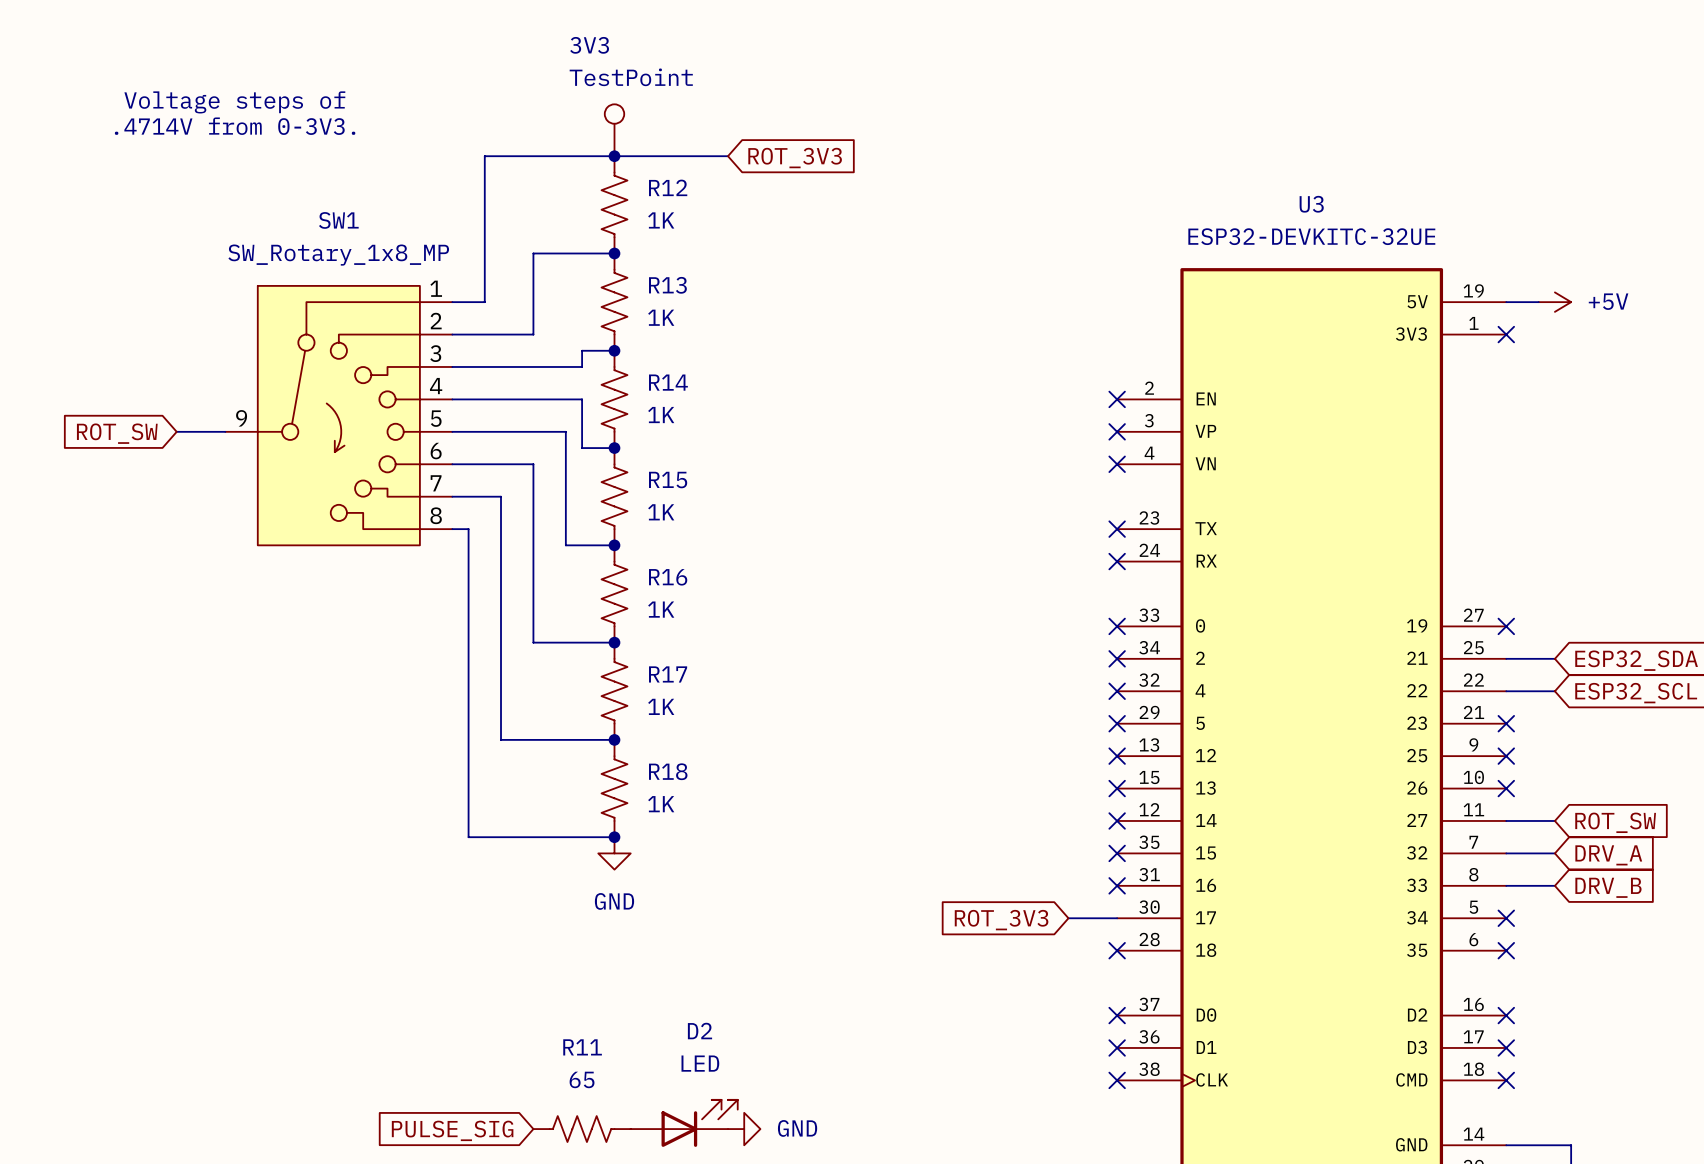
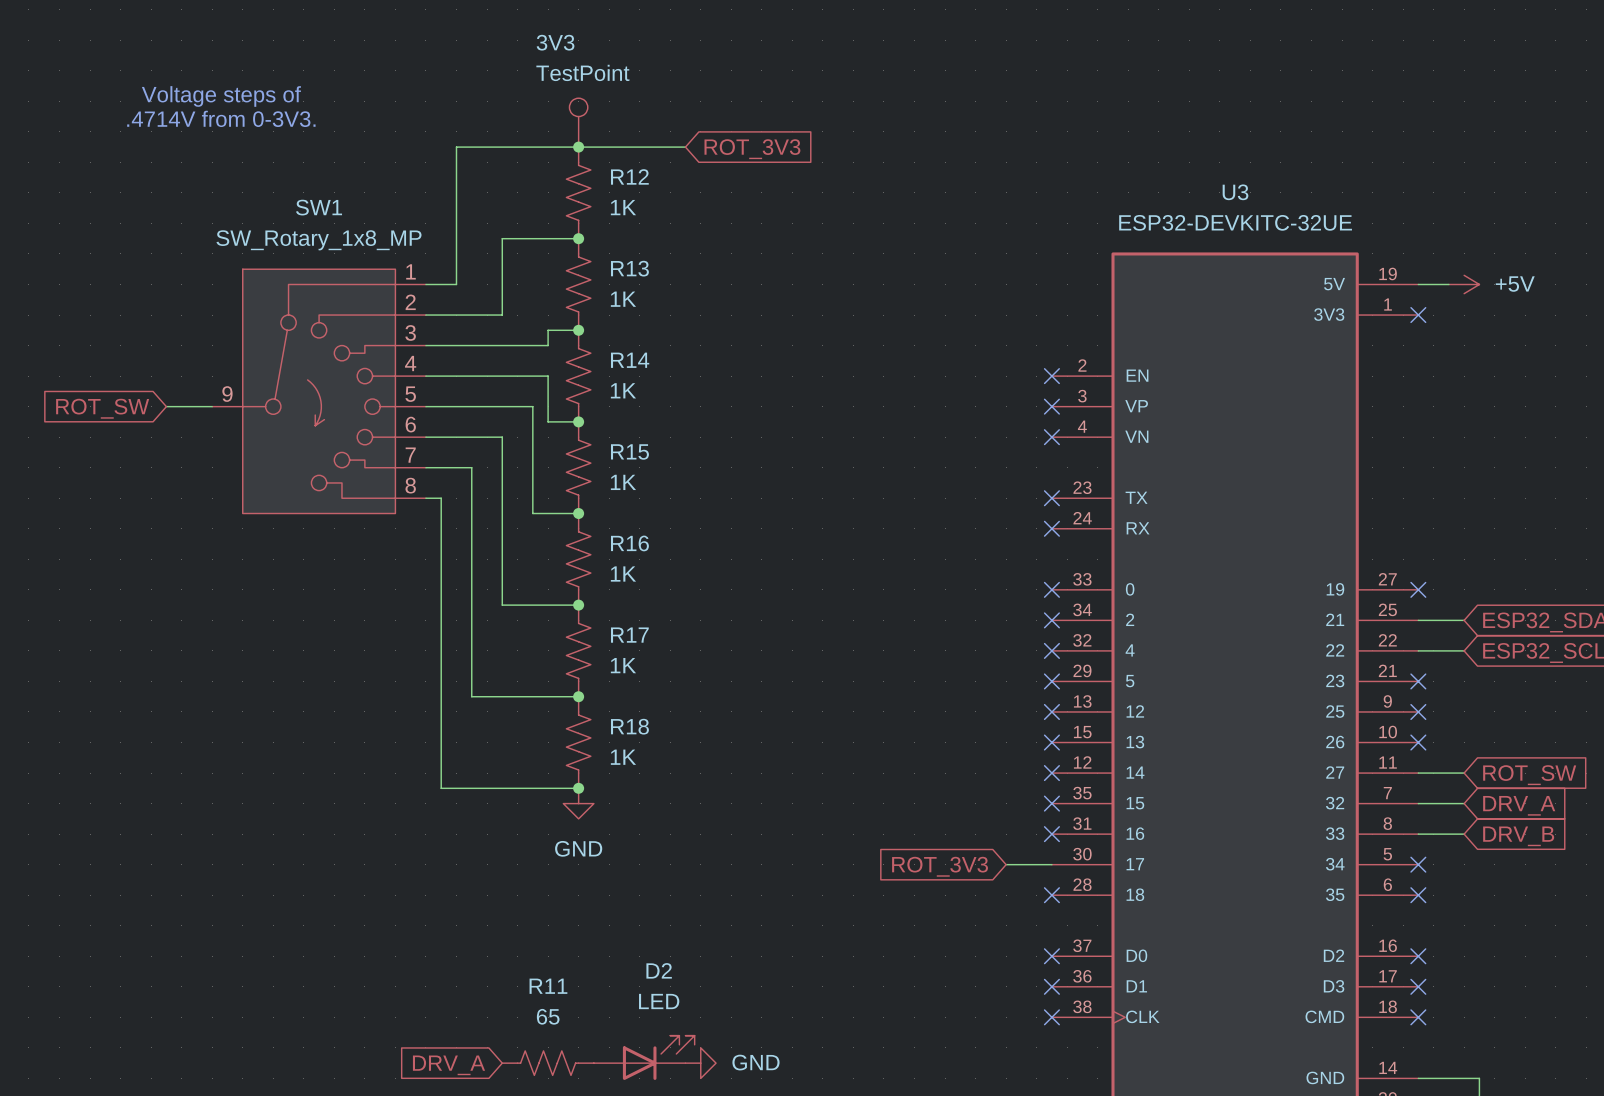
global label: PULSE_SIG (452, 1130) -> DRV_A (449, 1065)

